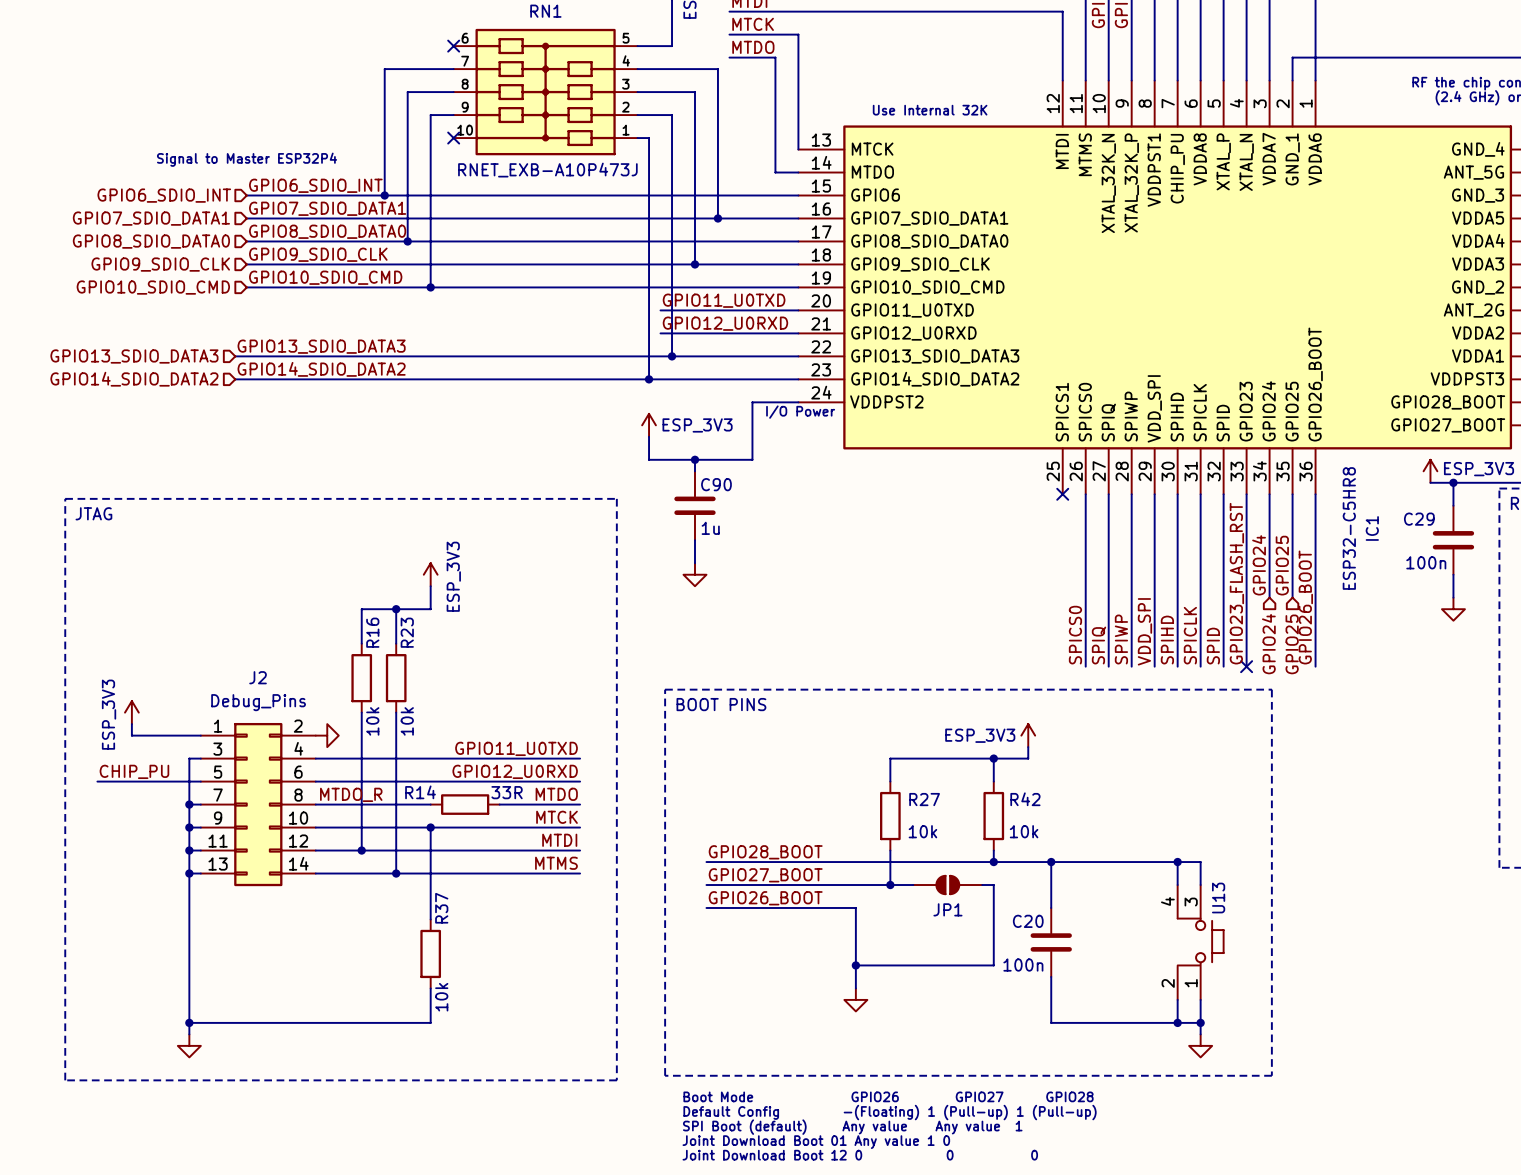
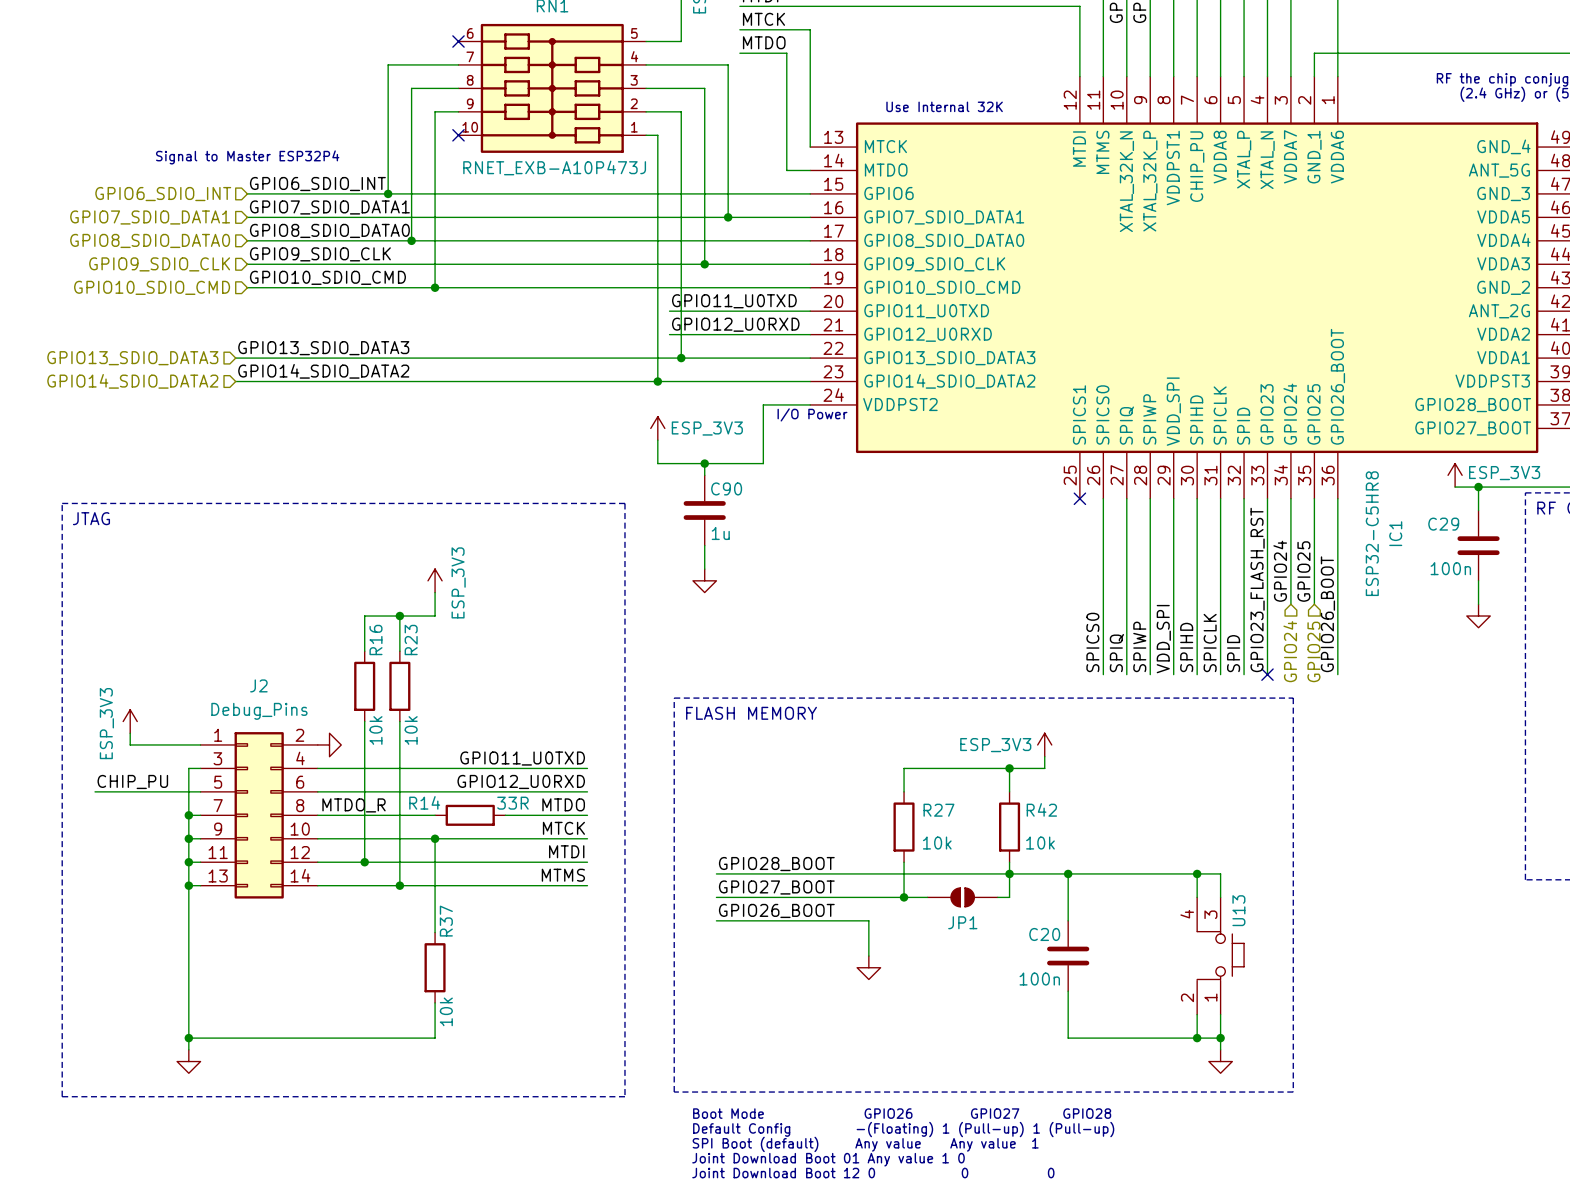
text: BOOT PINS (721, 704) -> FLASH MEMORY (751, 713)
wire: (993, 885) (993, 965) (855, 965) -> (1009, 897) (1009, 873)
wire: (855, 942) (855, 988) -> none
junction: (855, 965) -> none
power symbol position: (855, 999) -> (868, 967)

